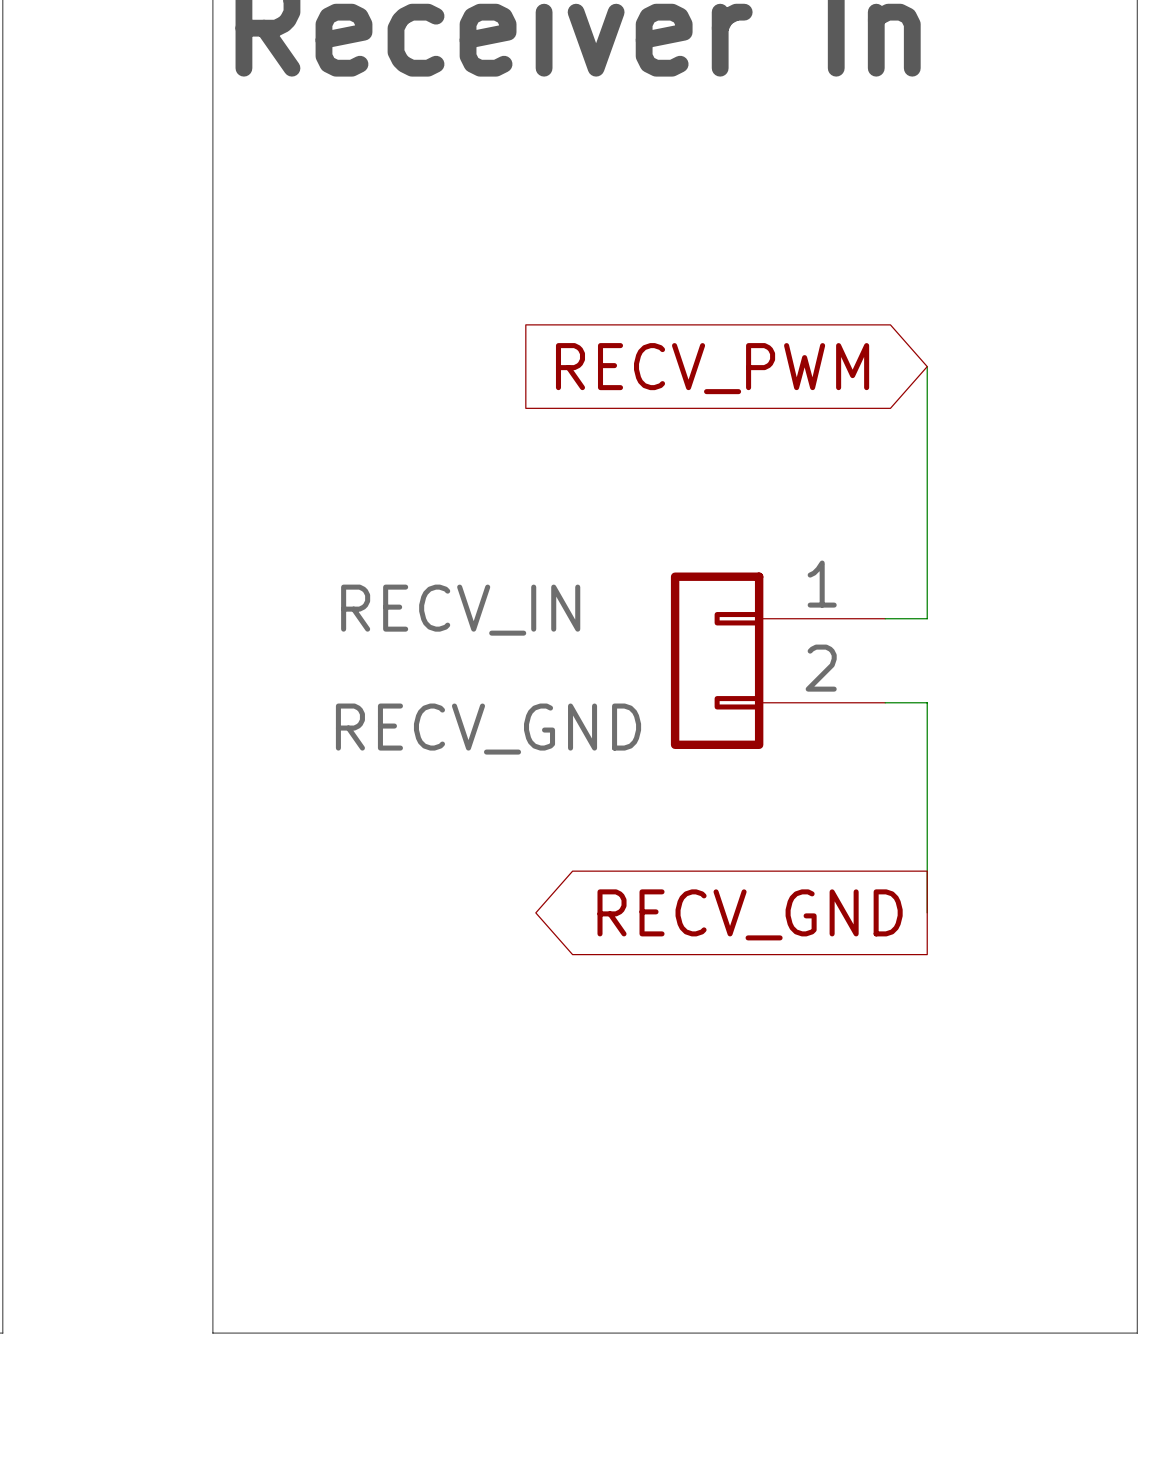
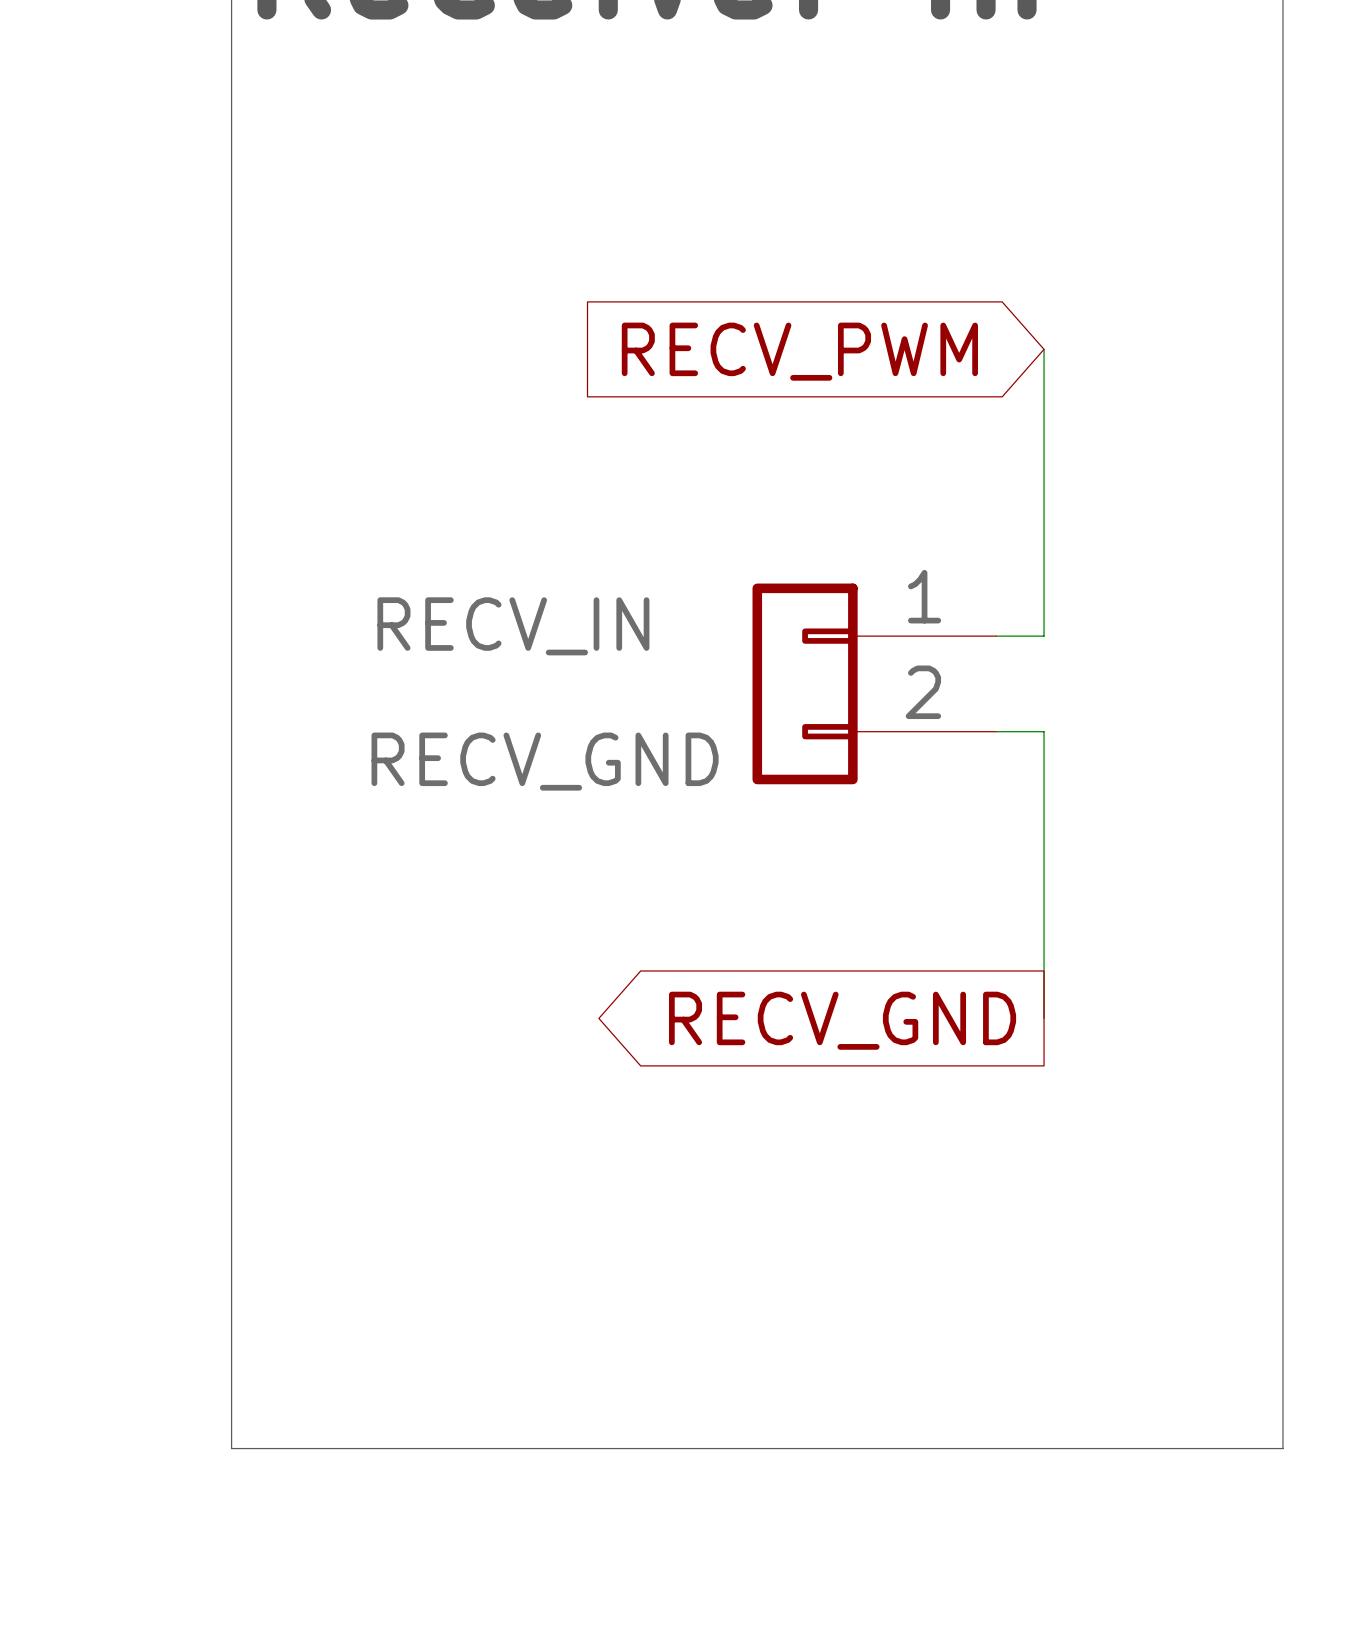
global label position: RECV_GND (750, 914) -> RECV_GND (842, 1020)

